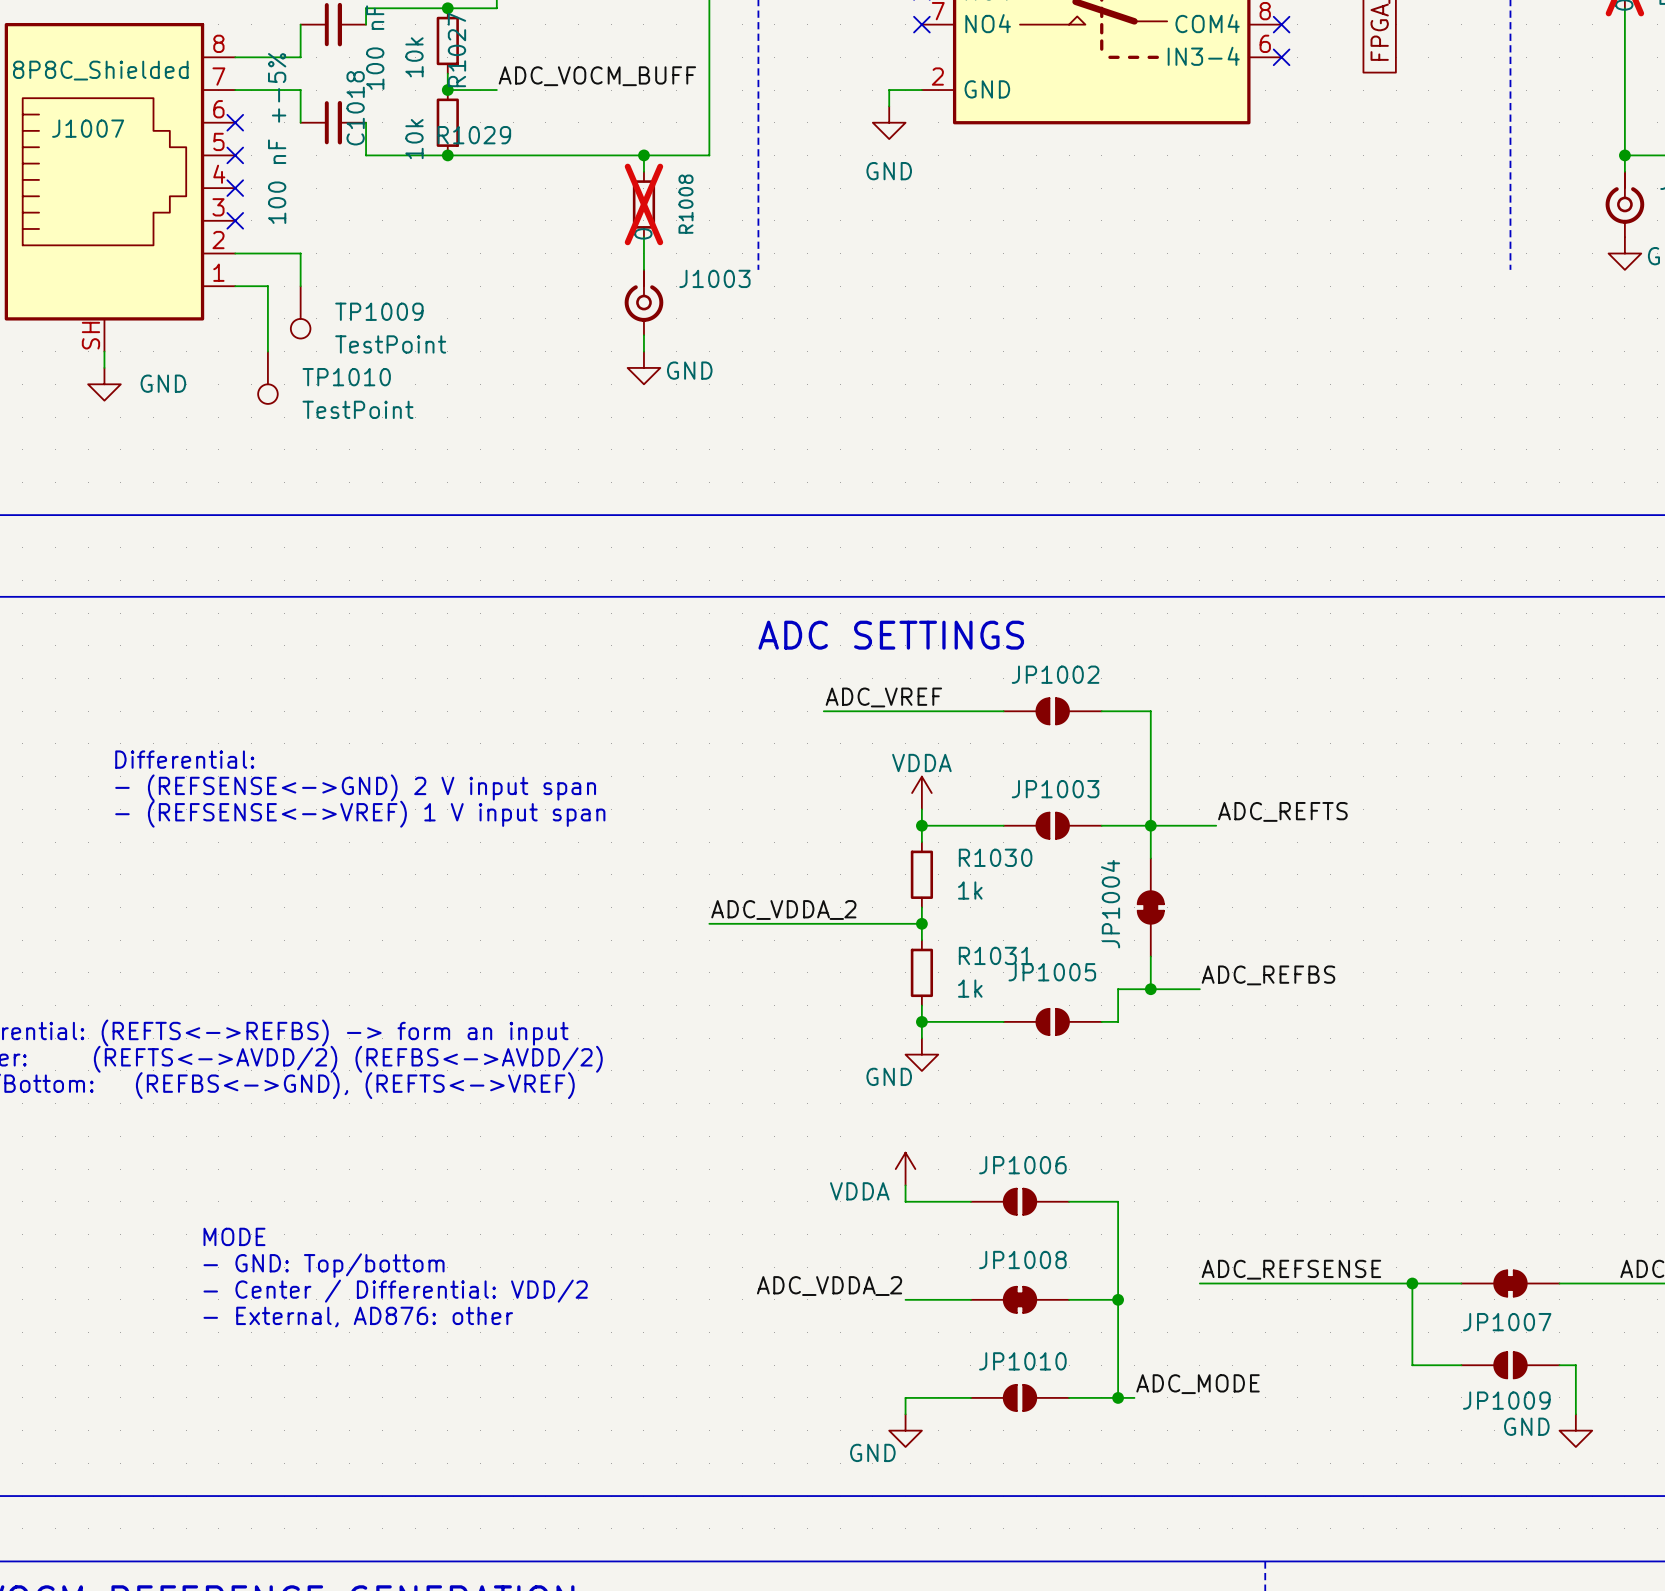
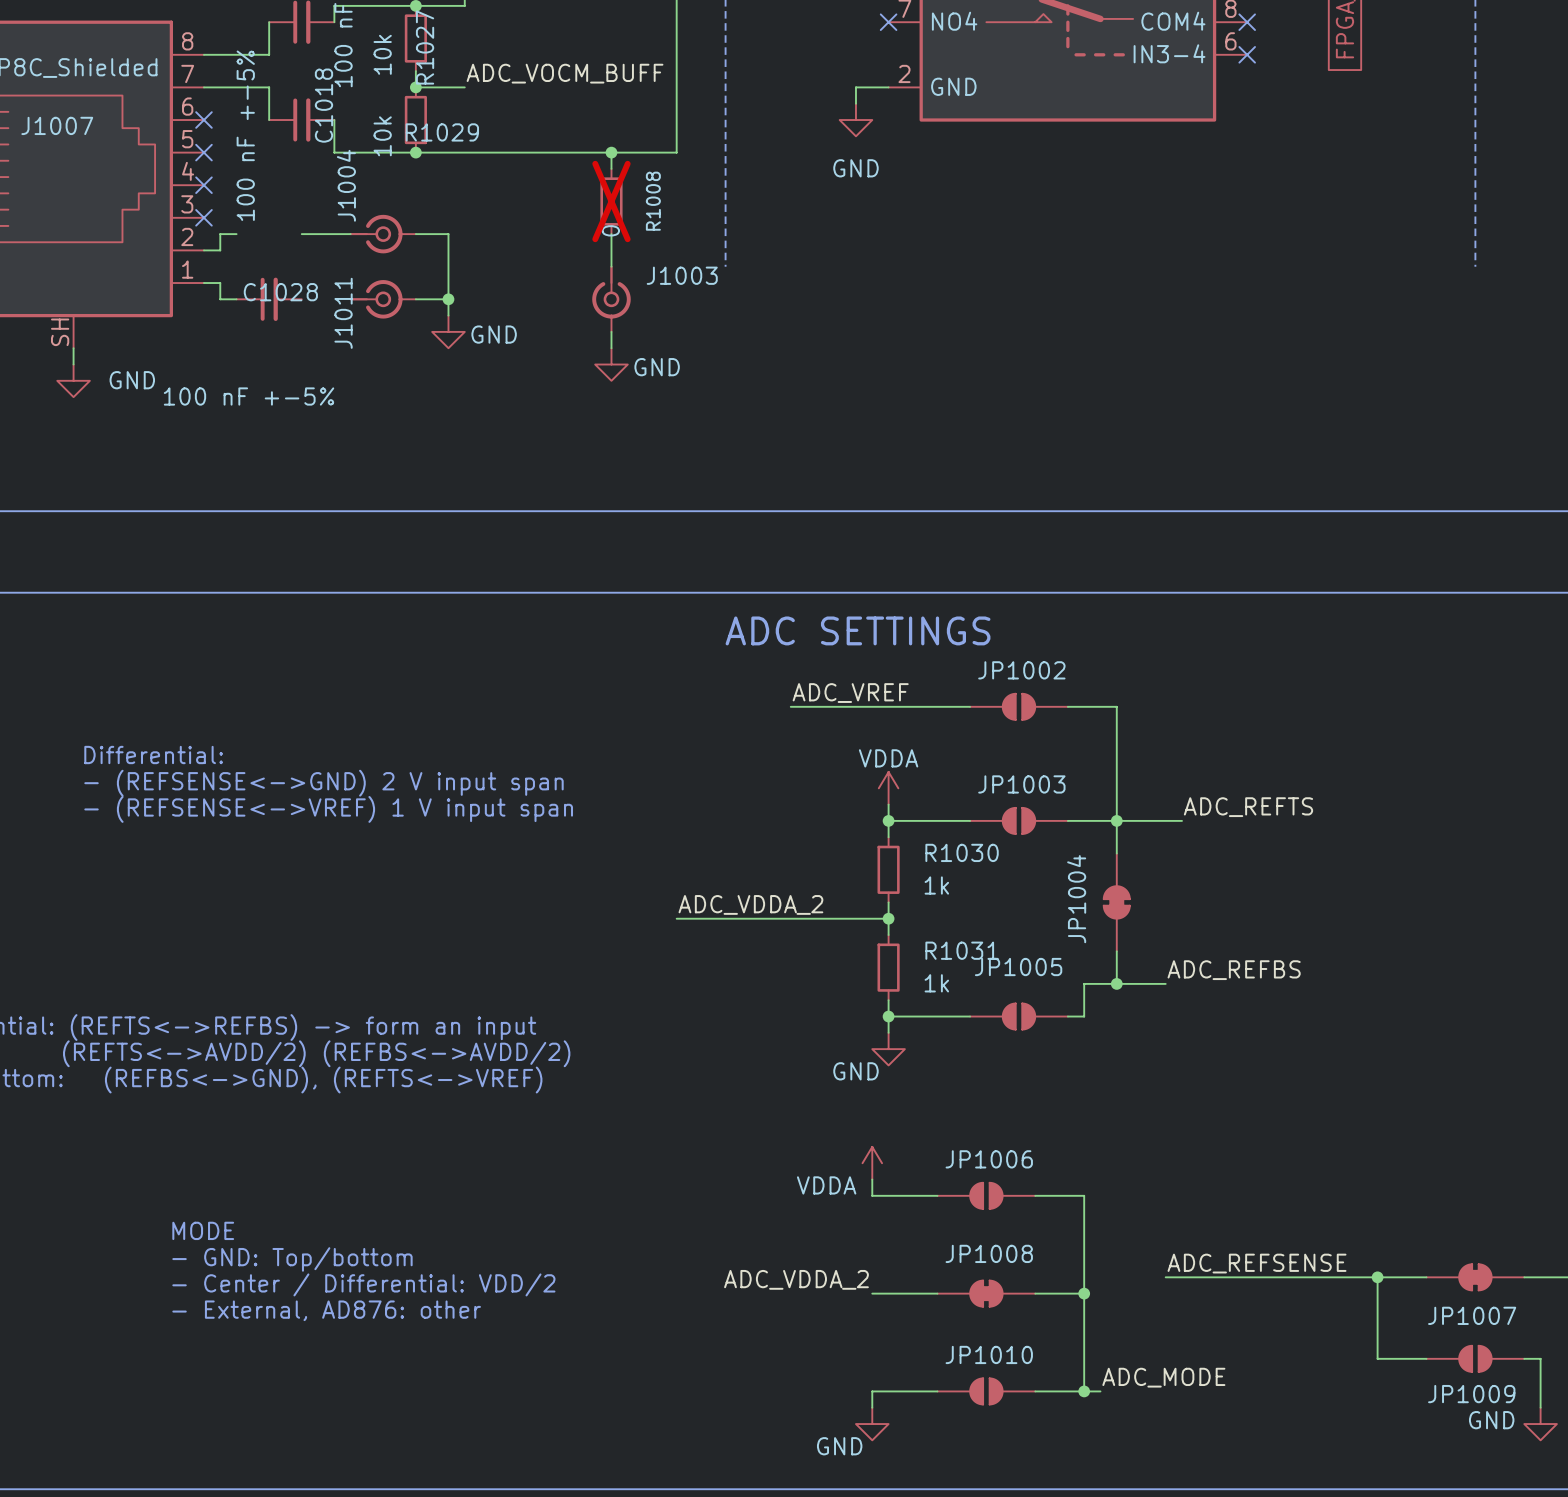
wire: none -> (301, 234) (350, 234)
J1004: none -> (383, 234)
wire: none -> (415, 234) (448, 234) (448, 315)
wire: (251, 253) (300, 253) (300, 286) -> (220, 250) (220, 234) (236, 234)
wire: (251, 286) (267, 286) (267, 351) -> (220, 283) (220, 299) (236, 299)
C1028: none -> 100 nF +-5% (269, 299)
J1011: none -> (383, 299)
wire: none -> (415, 299) (448, 299)
junction: none -> (448, 299)
TP1009: TestPoint (300, 312) -> none
power symbol: none -> GND (448, 331)
TP1010: TestPoint (267, 377) -> none

